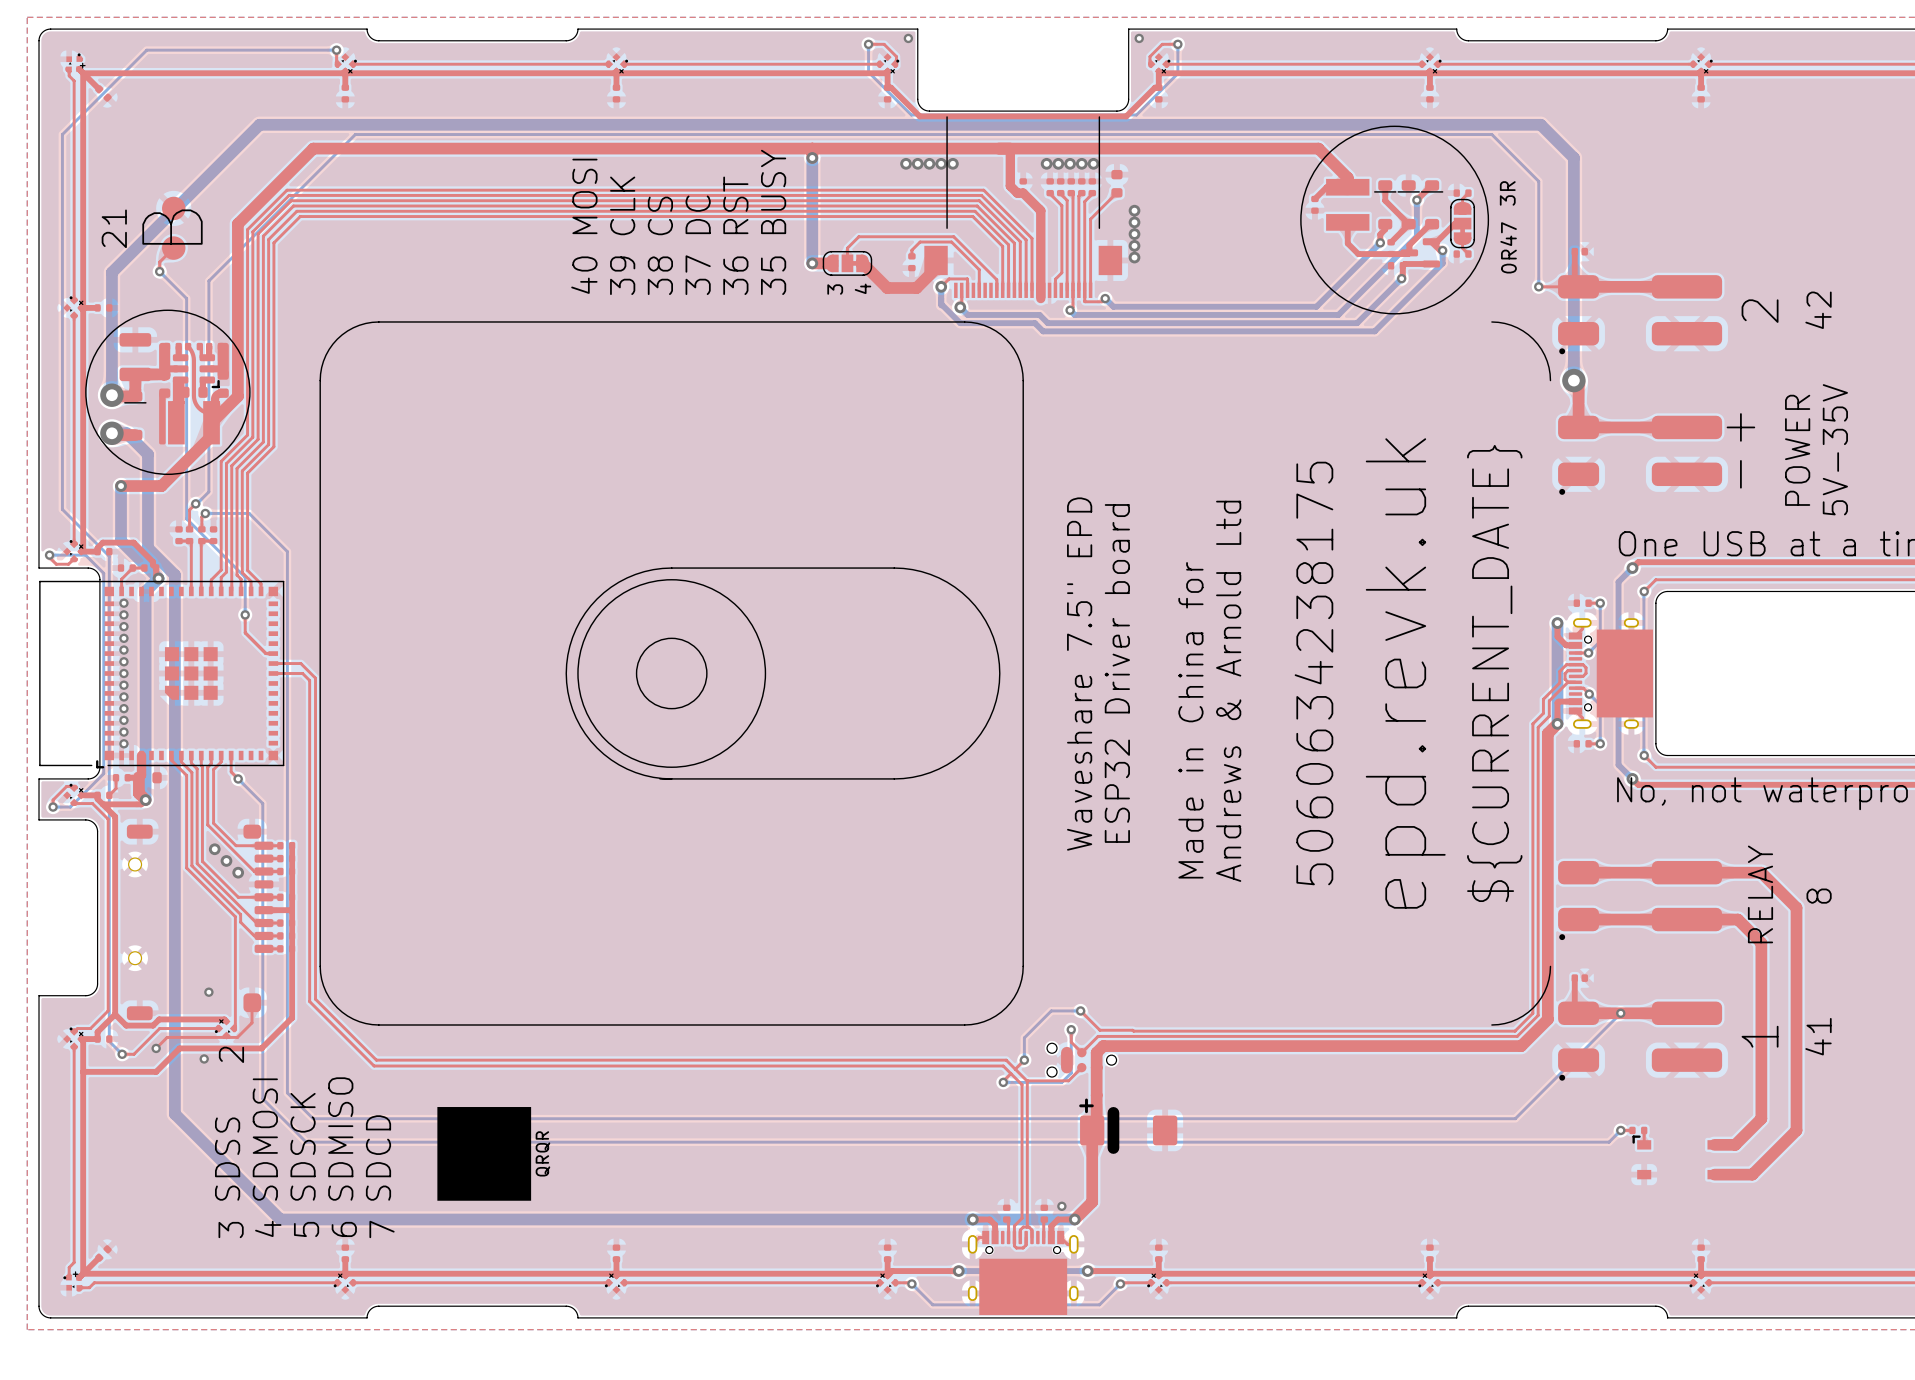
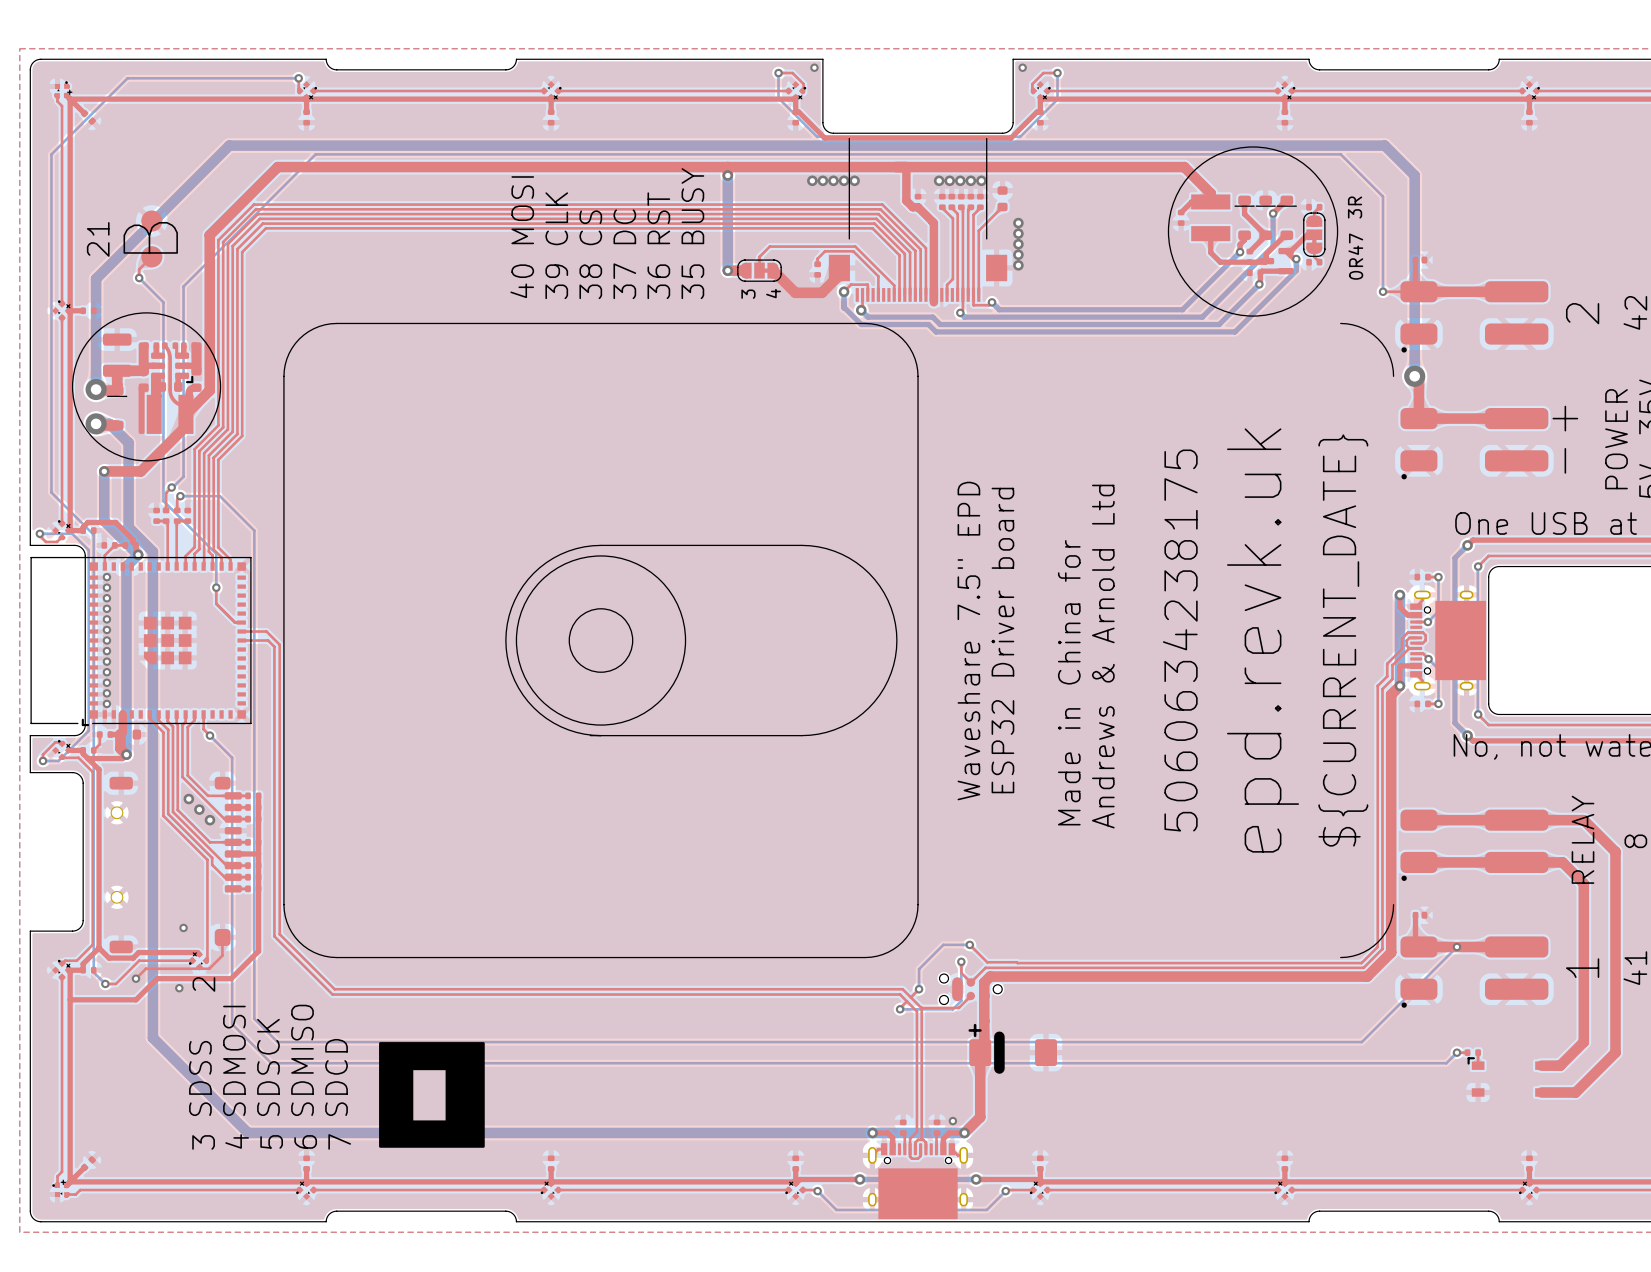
drawing: [437, 1107, 532, 1201] -> none
drawing: none -> [379, 1042, 485, 1148]
text: QRQR (542, 1153) -> none

